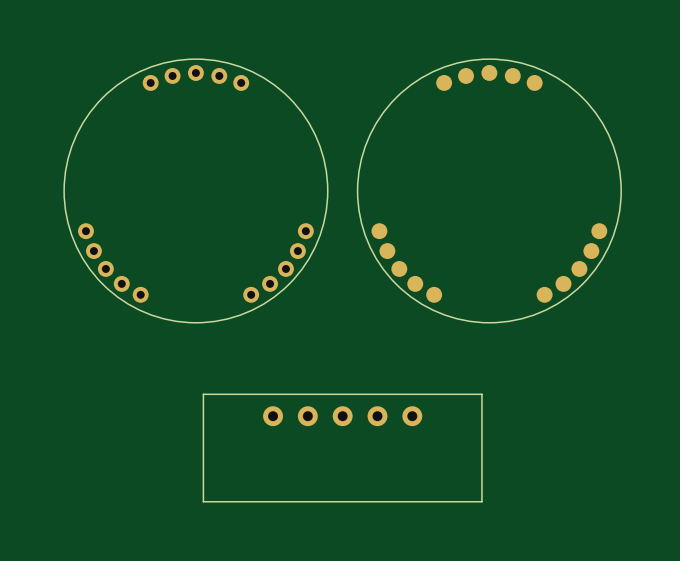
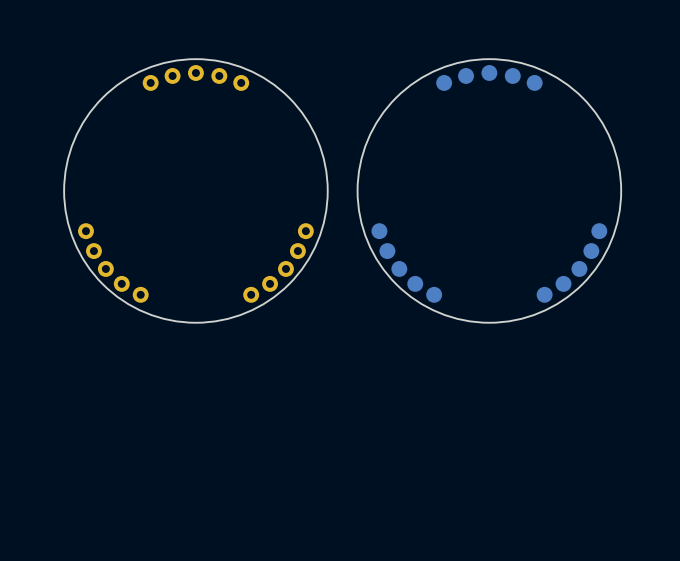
board edge: (481, 394) (203, 394) (203, 501) (481, 501) (481, 394) -> none
part: (273, 416) -> none
part: (307, 416) -> none
part: (342, 416) -> none
part: (377, 416) -> none
part: (412, 416) -> none

